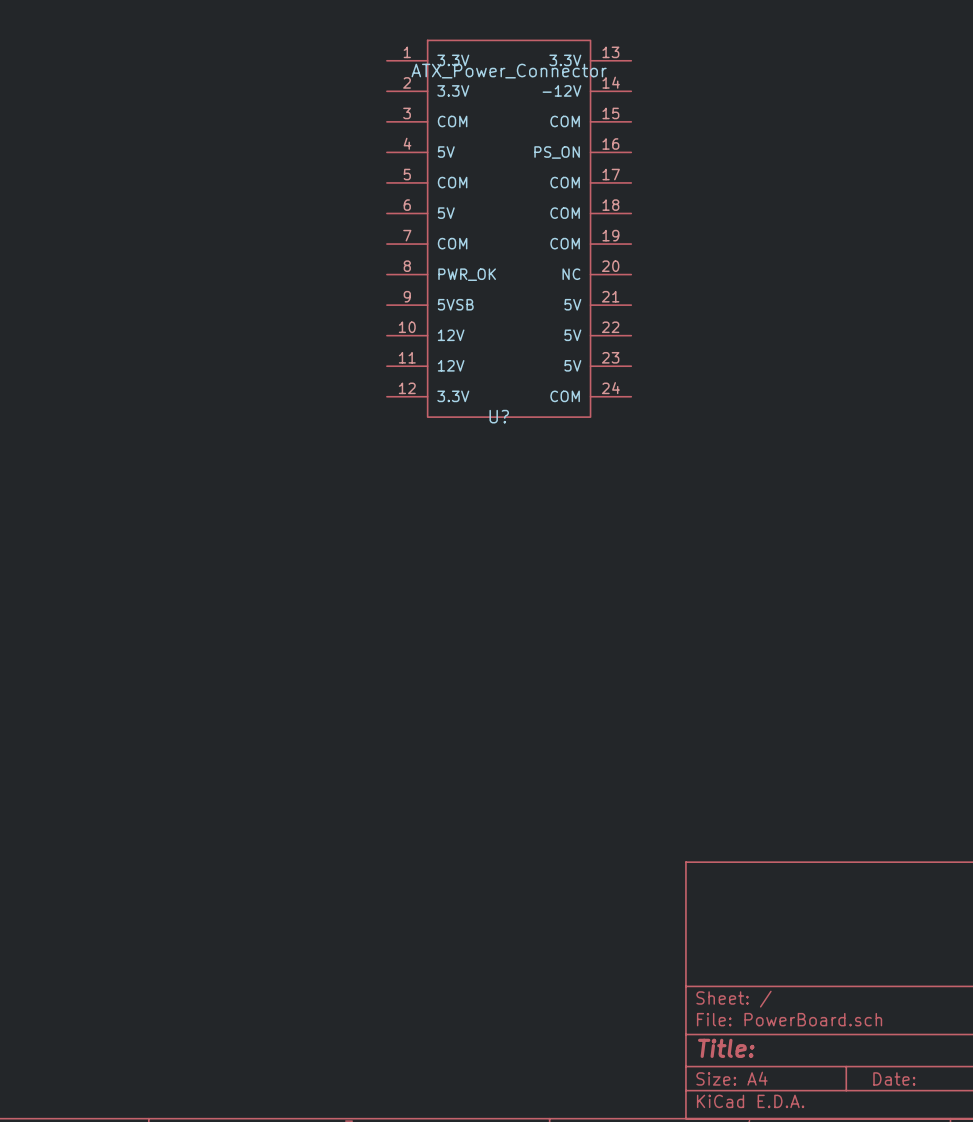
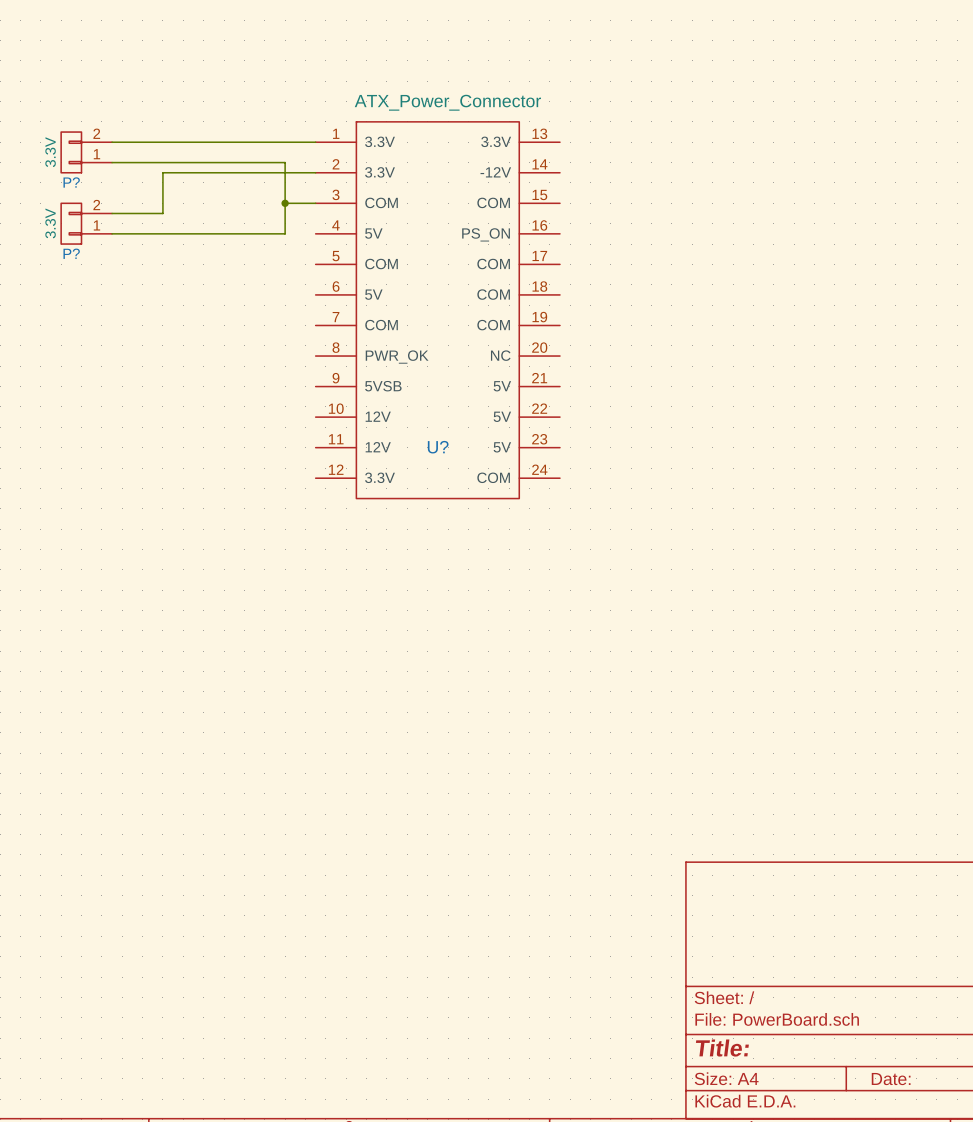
U? value position: ATX_Power_Connector (509, 71) -> ATX_Power_Connector (447, 102)
wire: none -> (112, 142) (315, 142)
P?: none -> 3.3V (86, 152)
wire: none -> (112, 162) (285, 162) (285, 233) (112, 233)
wire: none -> (315, 172) (162, 172) (162, 213) (112, 213)
wire: none -> (285, 203) (315, 203)
junction: none -> (285, 203)
P?: none -> 3.3V (86, 223)
U? position: (509, 228) -> (437, 310)
U? name position: U? (499, 416) -> U? (438, 447)

